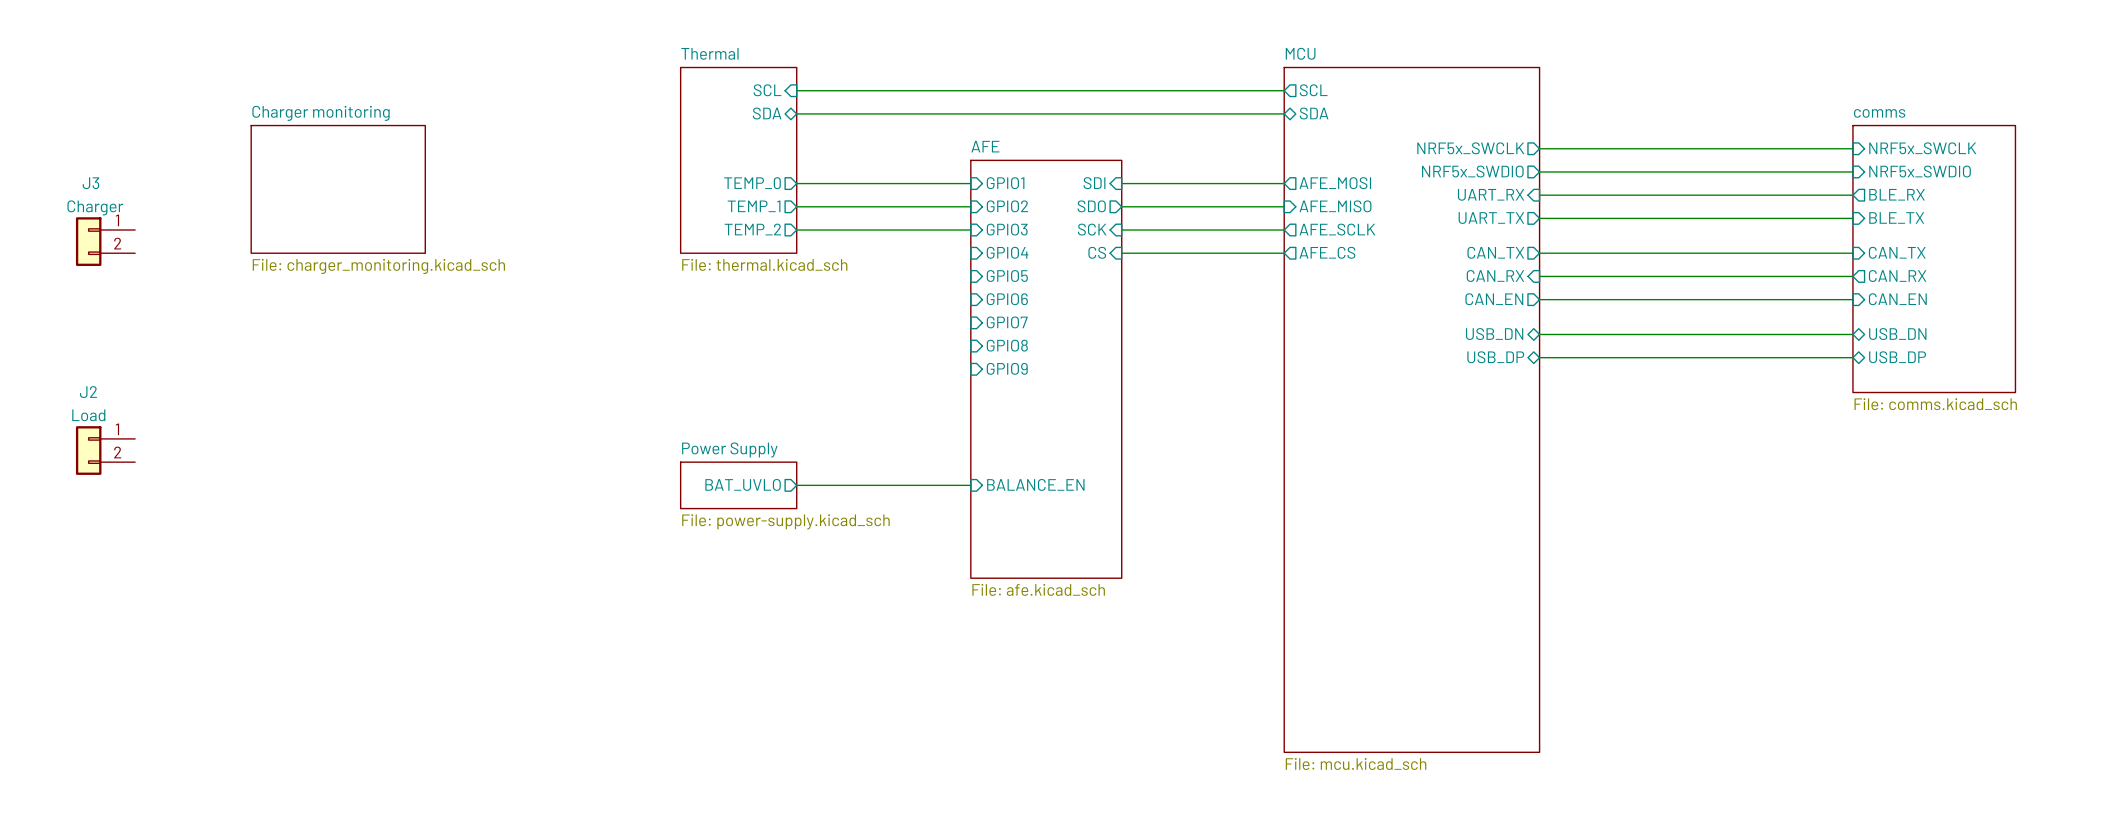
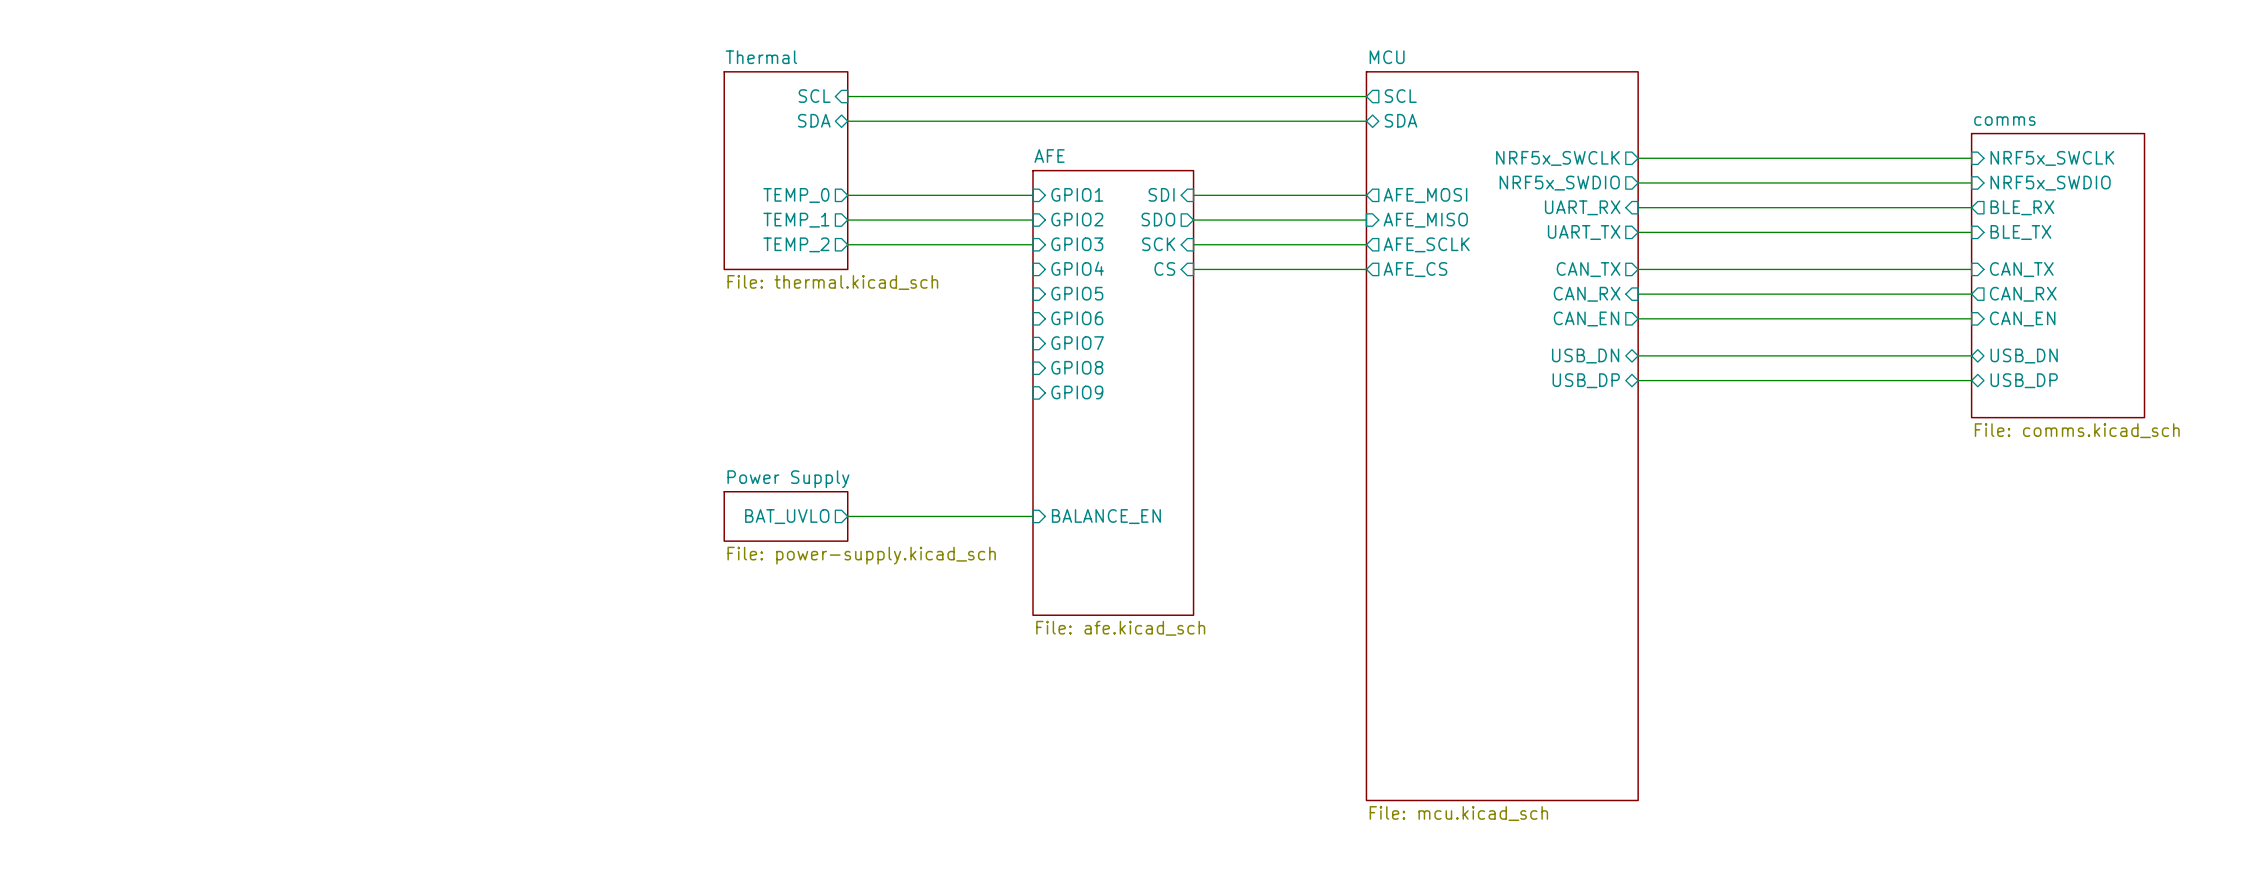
sheet Charger monitoring: File: charger_monitoring.kicad_sch (338, 189) -> none
J3: Charger (105, 241) -> none
J2: Load (105, 450) -> none

